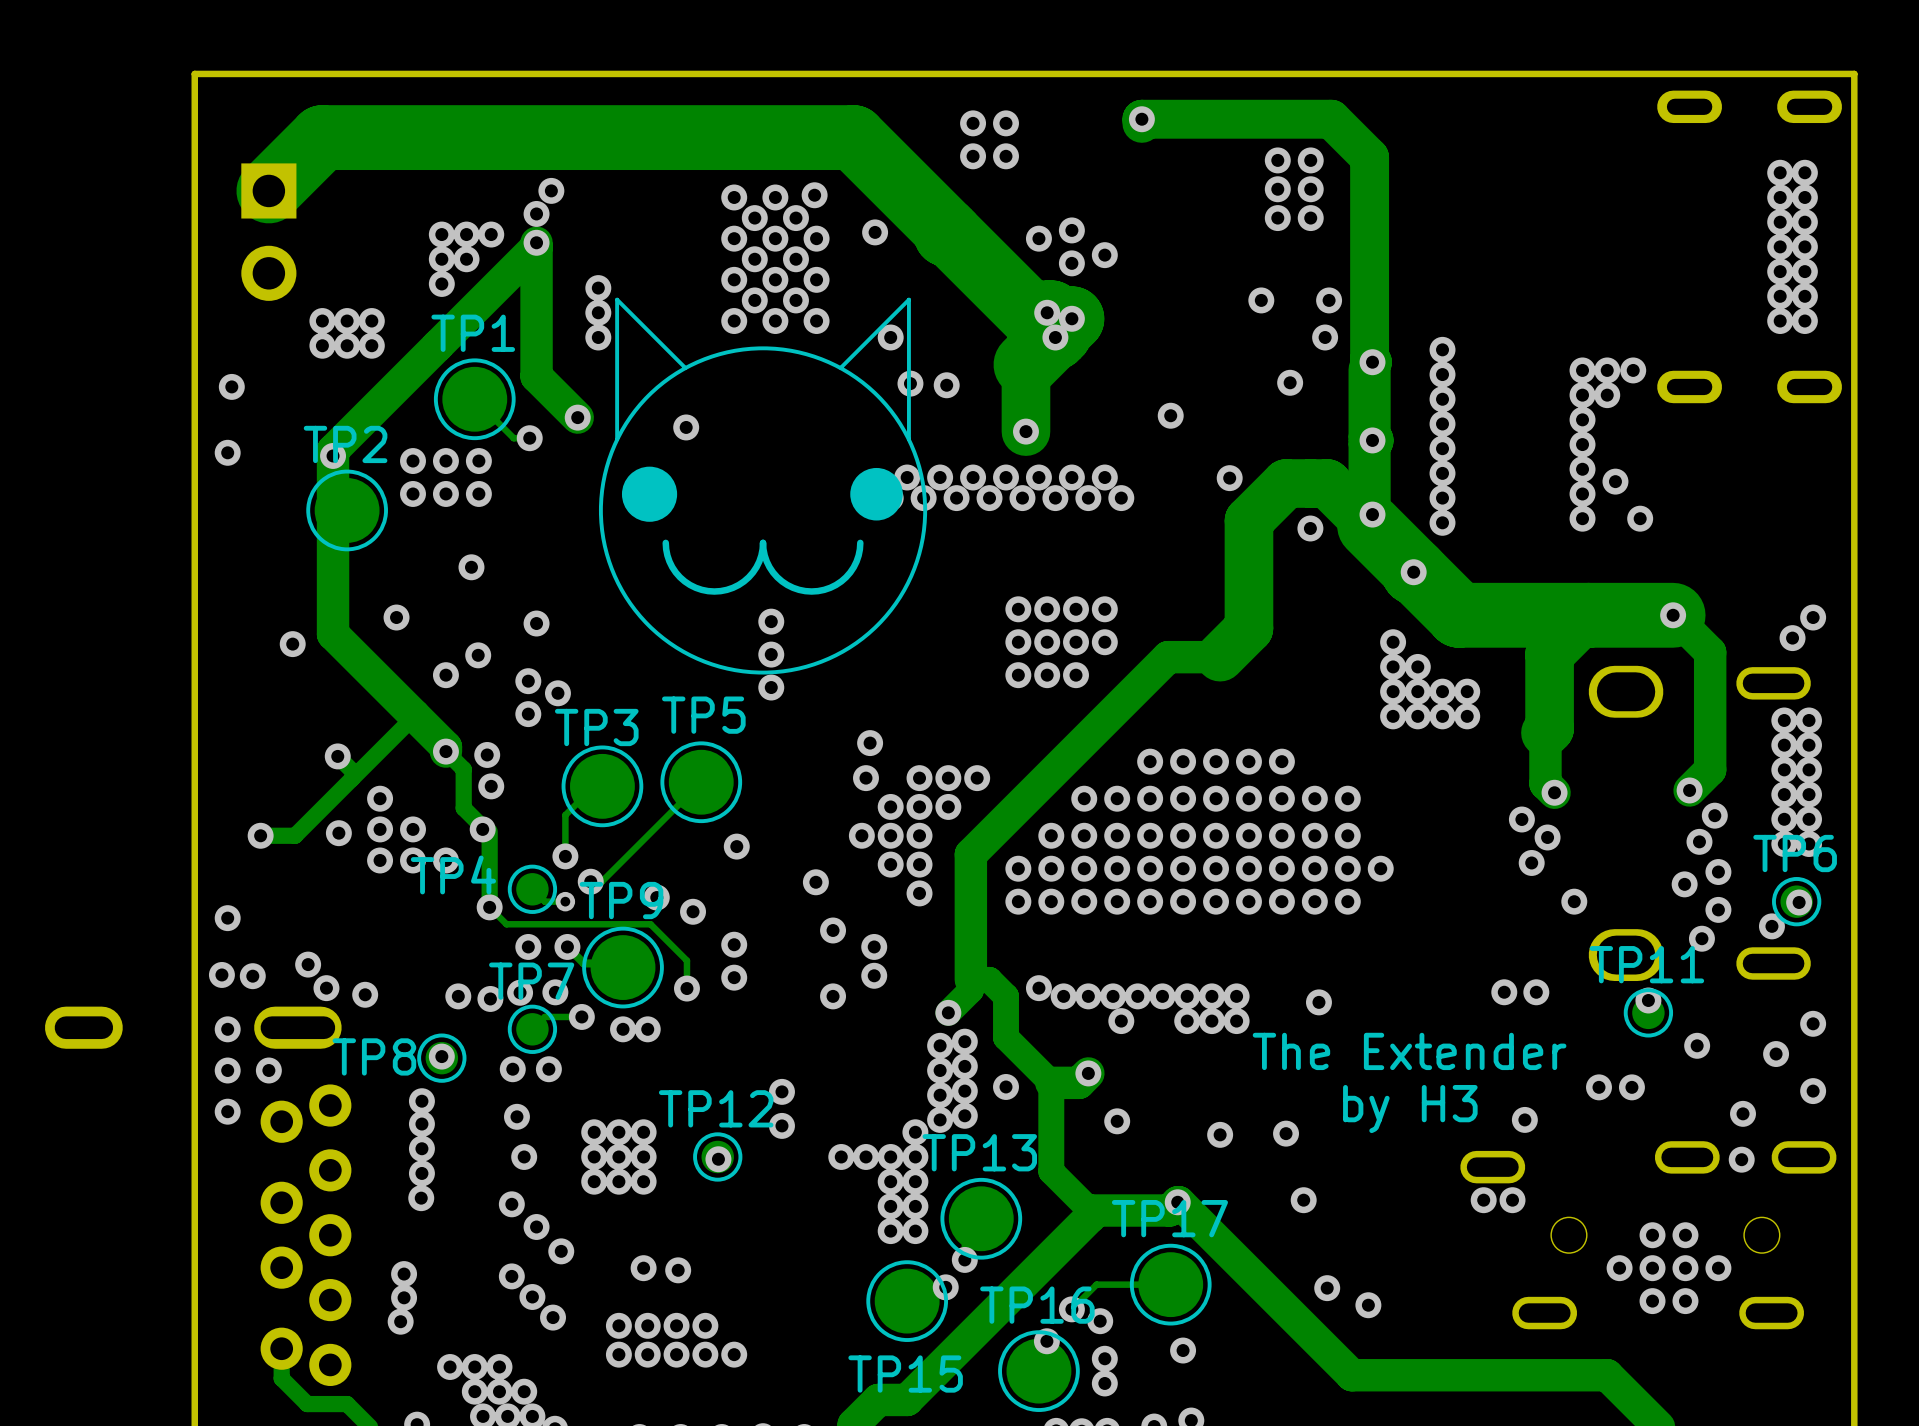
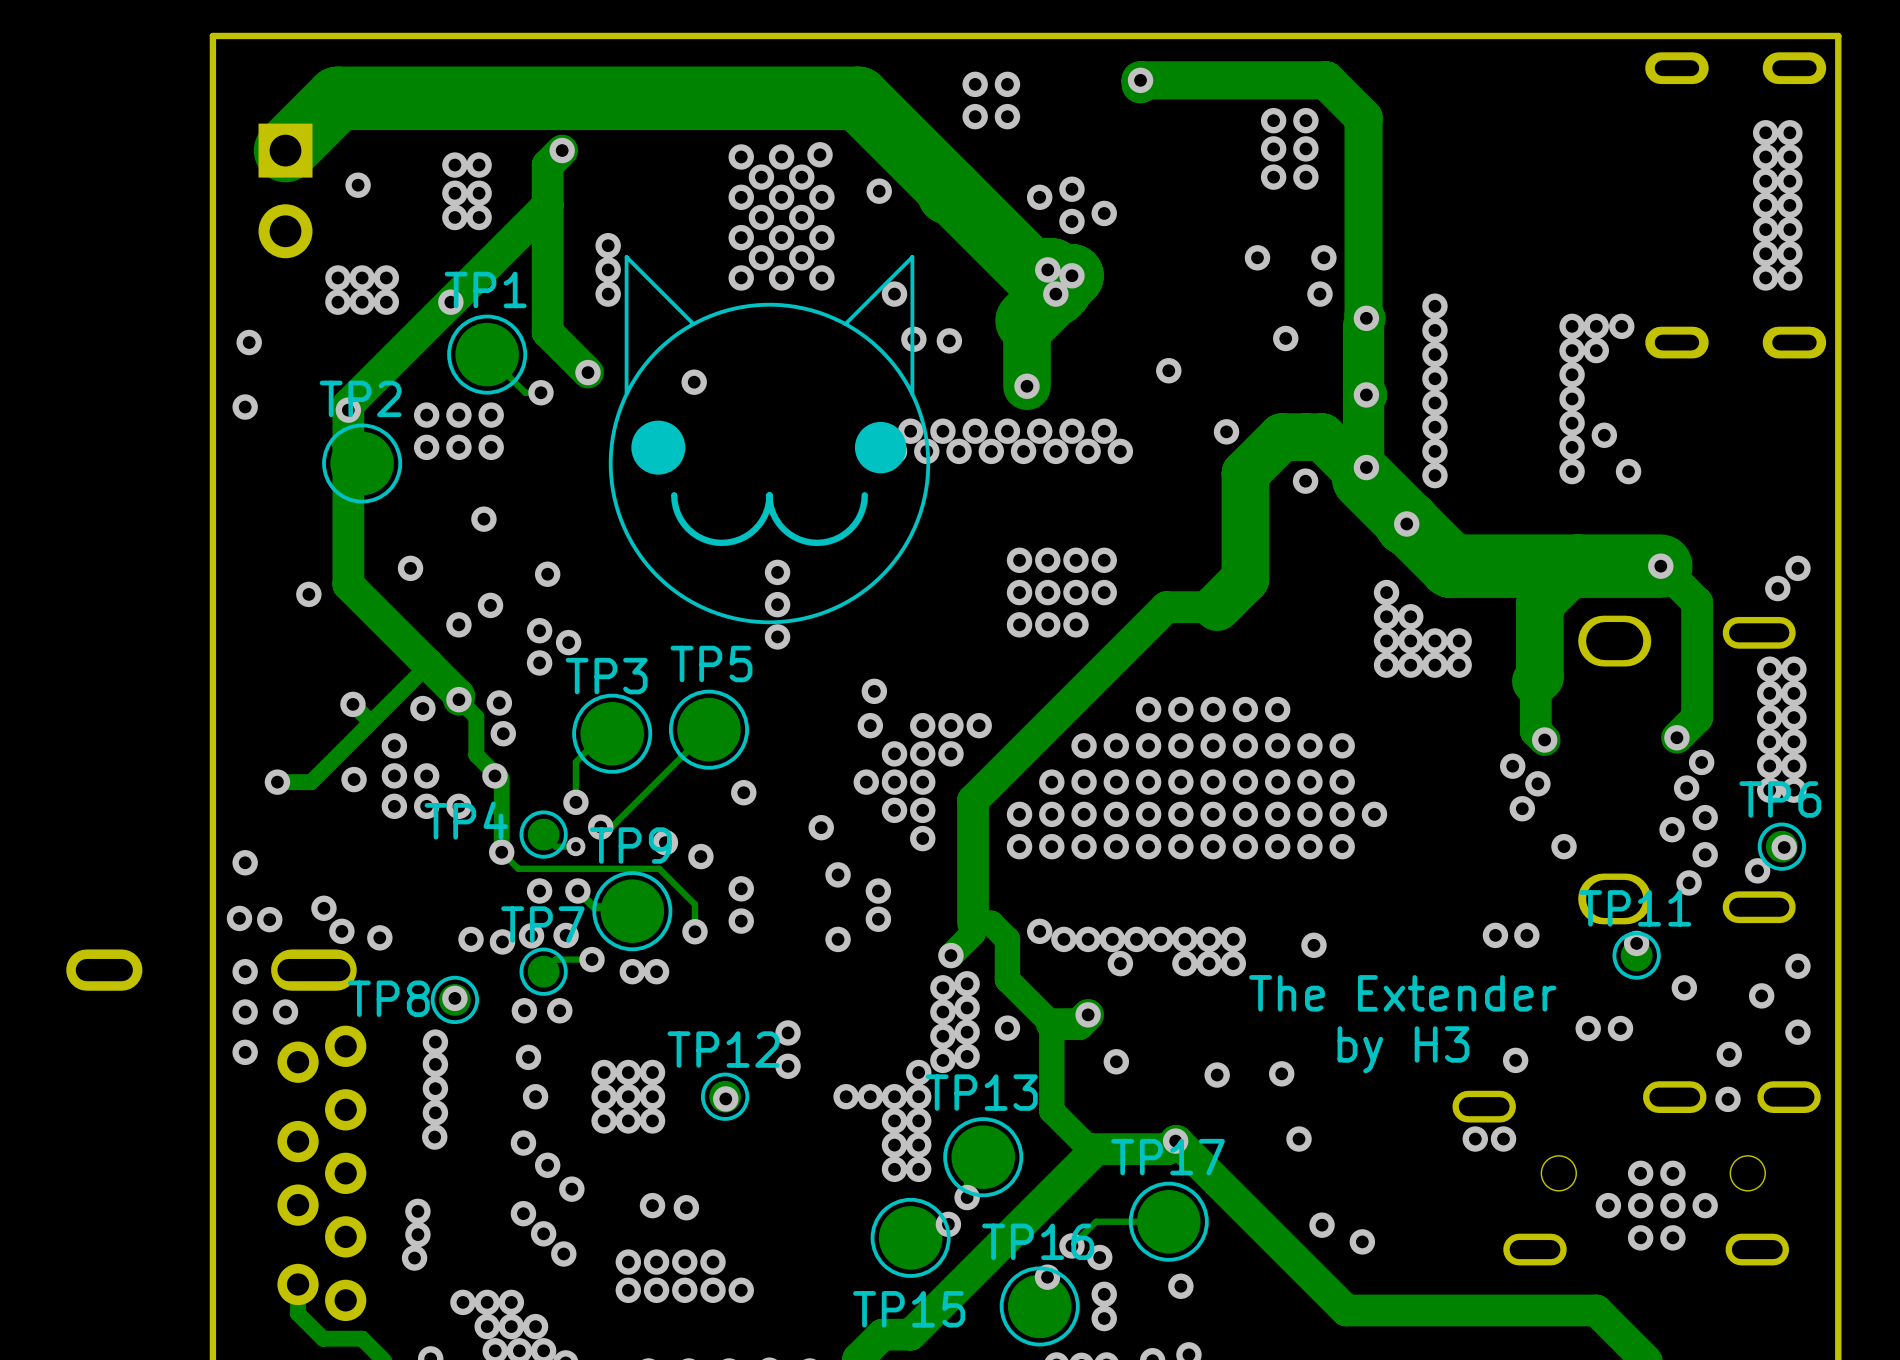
track: none -> (562, 150) (547, 165) (547, 201)
via: none -> (454, 165)
via: none -> (479, 165)
via: (536, 213) -> none
via: none -> (358, 185)
via: (491, 234) -> none
via: (536, 242) -> none
via: (441, 283) -> none
via: none -> (450, 302)
via: none -> (422, 708)

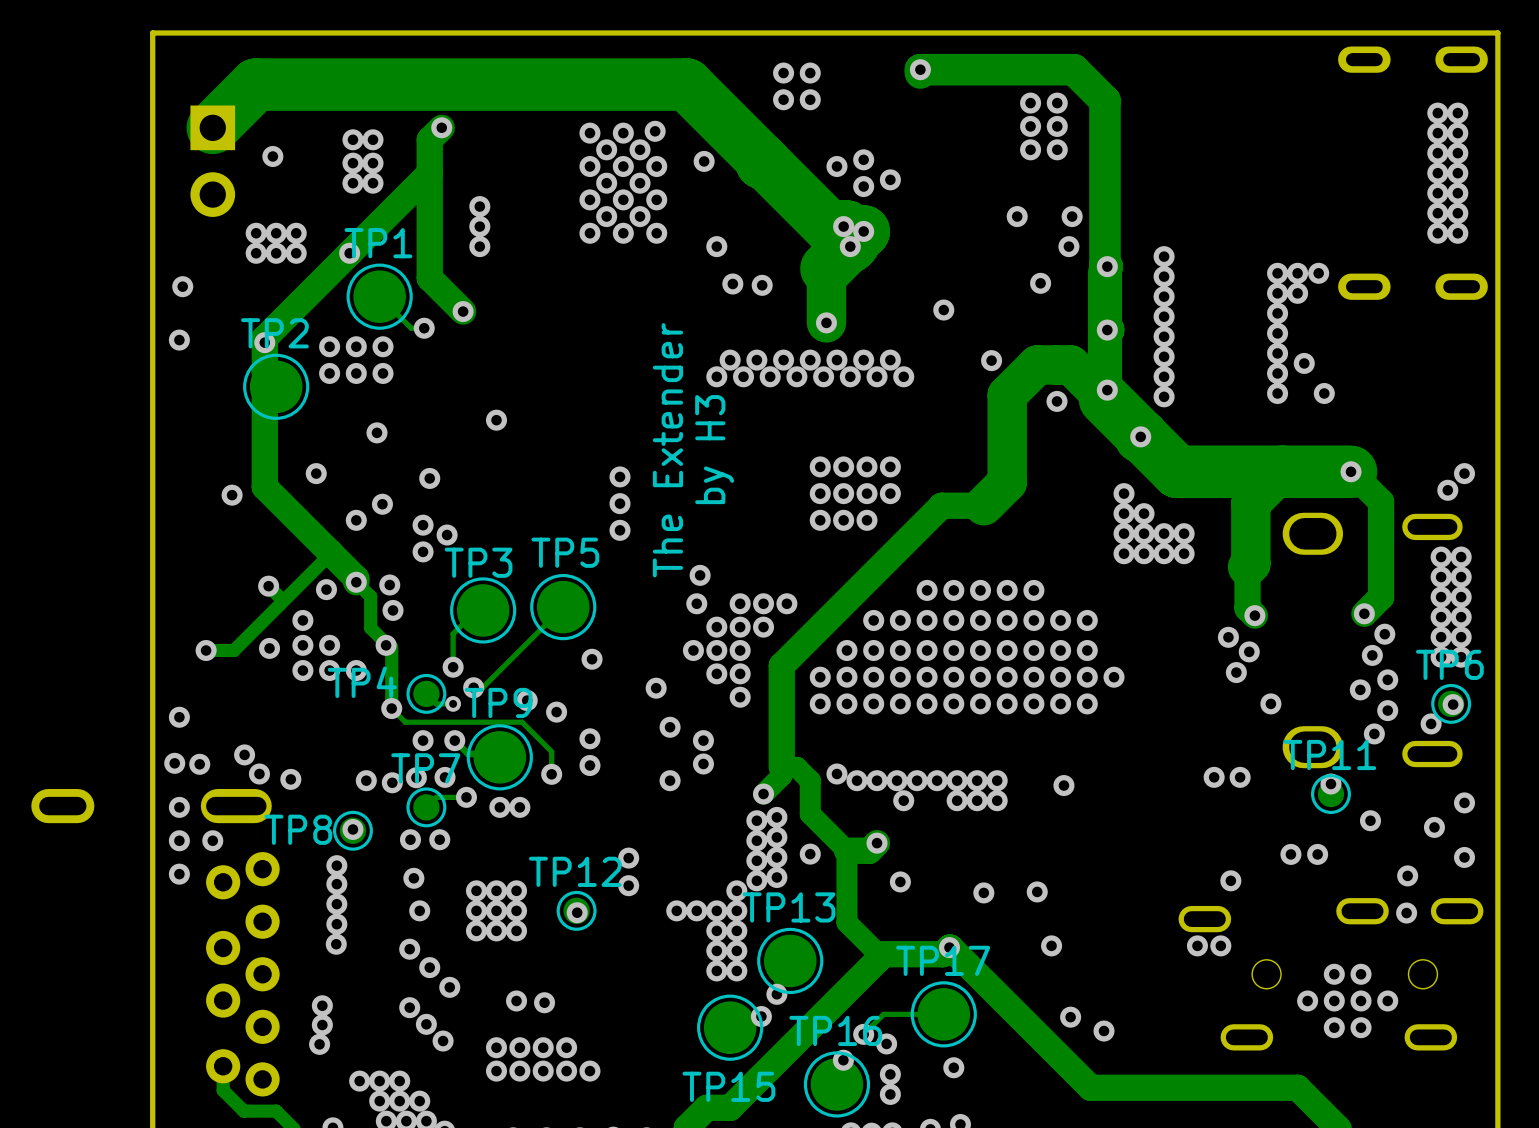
drawing: [608, 255, 931, 625] -> none
via position: (694, 382) -> (496, 420)
text rotation: 0° (1402, 993) -> 90° counterclockwise (667, 450)
text position: The Extender (1402, 993) -> The Extender (667, 450)
text rotation: 0° (1403, 1049) -> 90° counterclockwise (714, 449)
text position: by H3 (1403, 1049) -> by H3 (714, 449)

